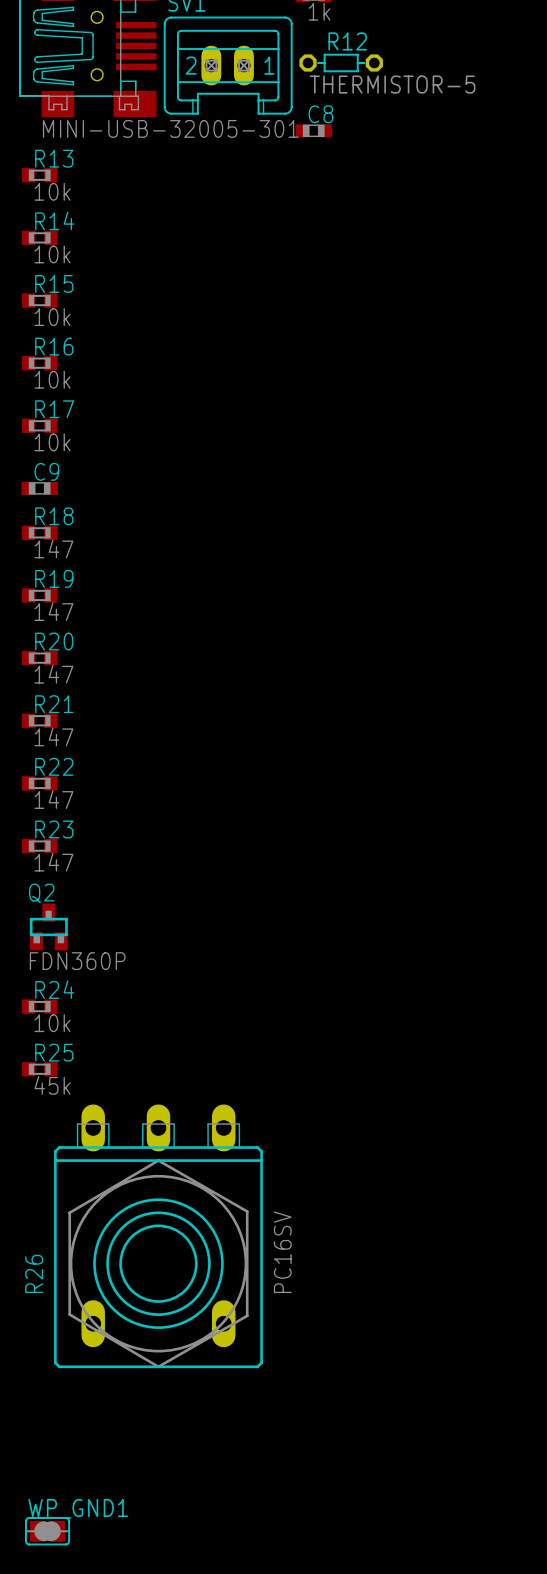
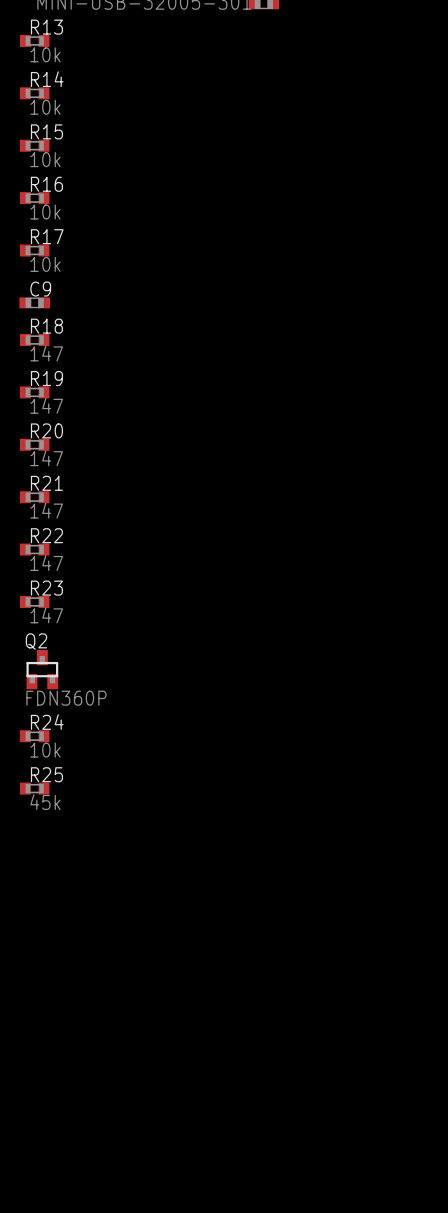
R26: PC16SV (158, 1236) -> none
WP_GND1: (47, 1531) -> none

